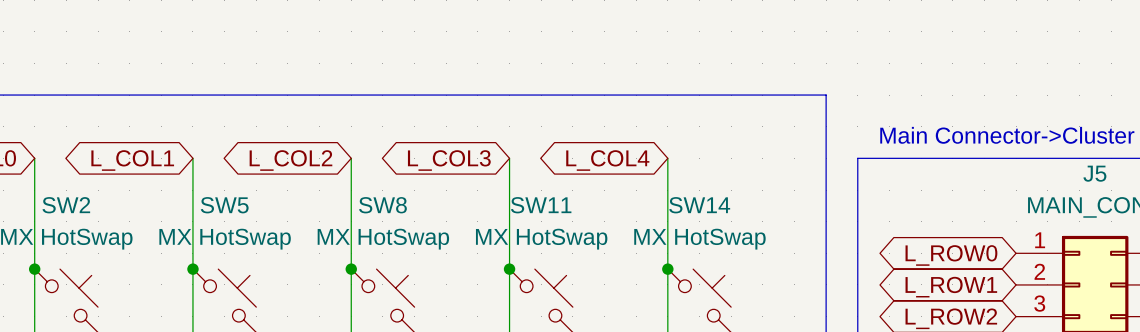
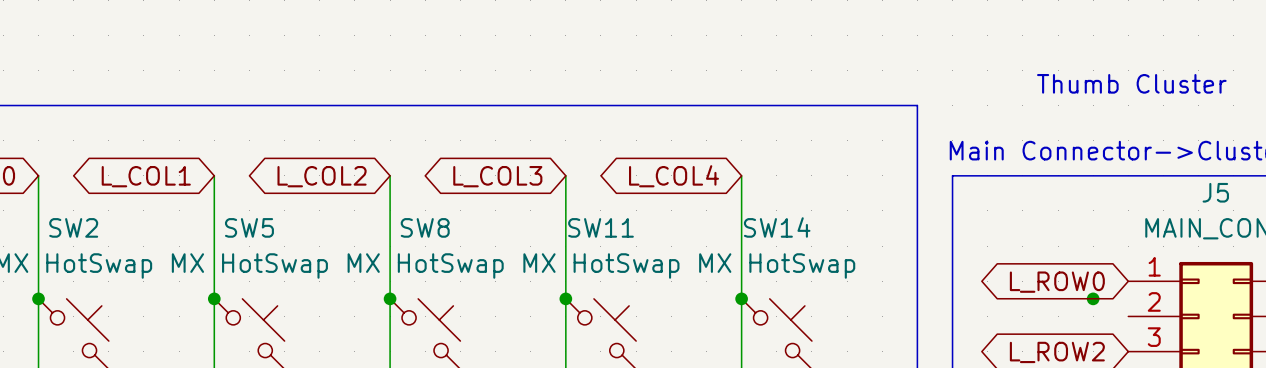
text: none -> Thumb Cluster (1131, 83)
junction: none -> (1093, 298)
global label: L_ROW1 (951, 287) -> none

